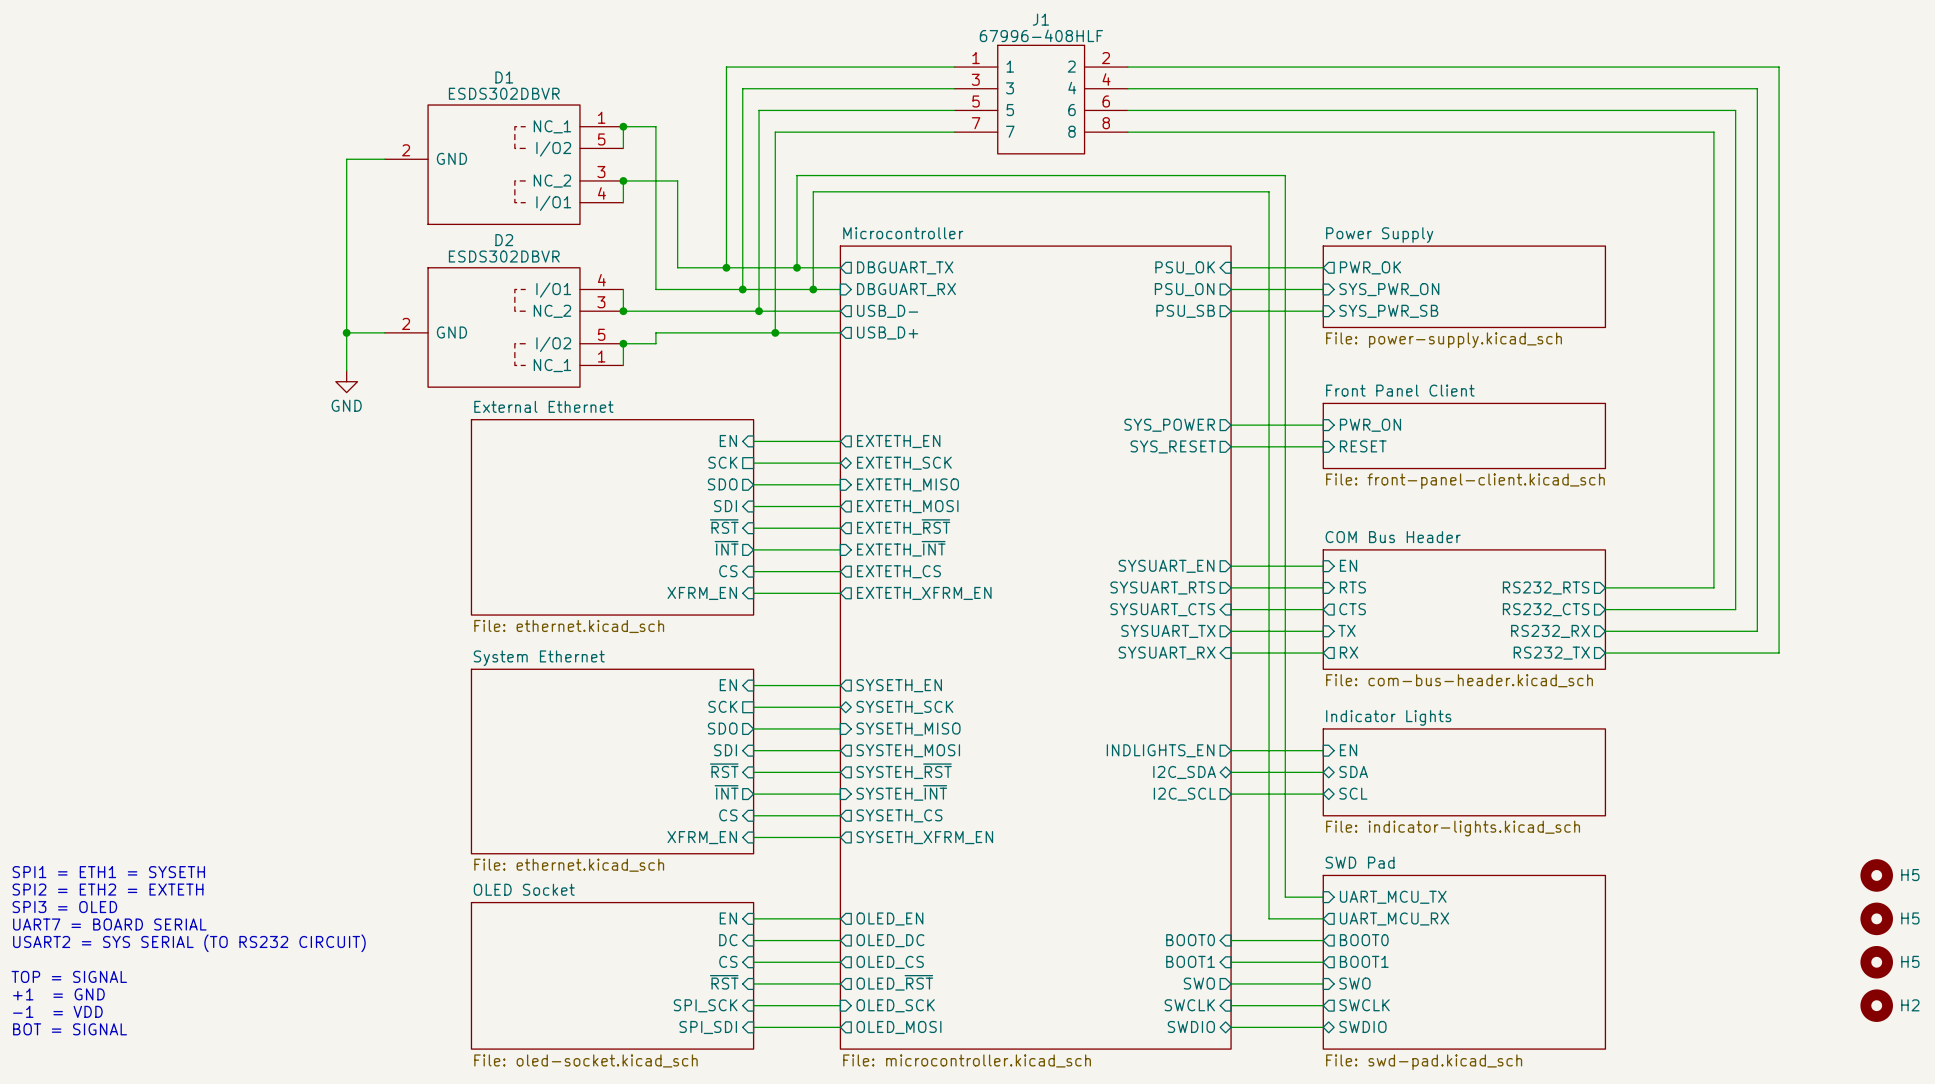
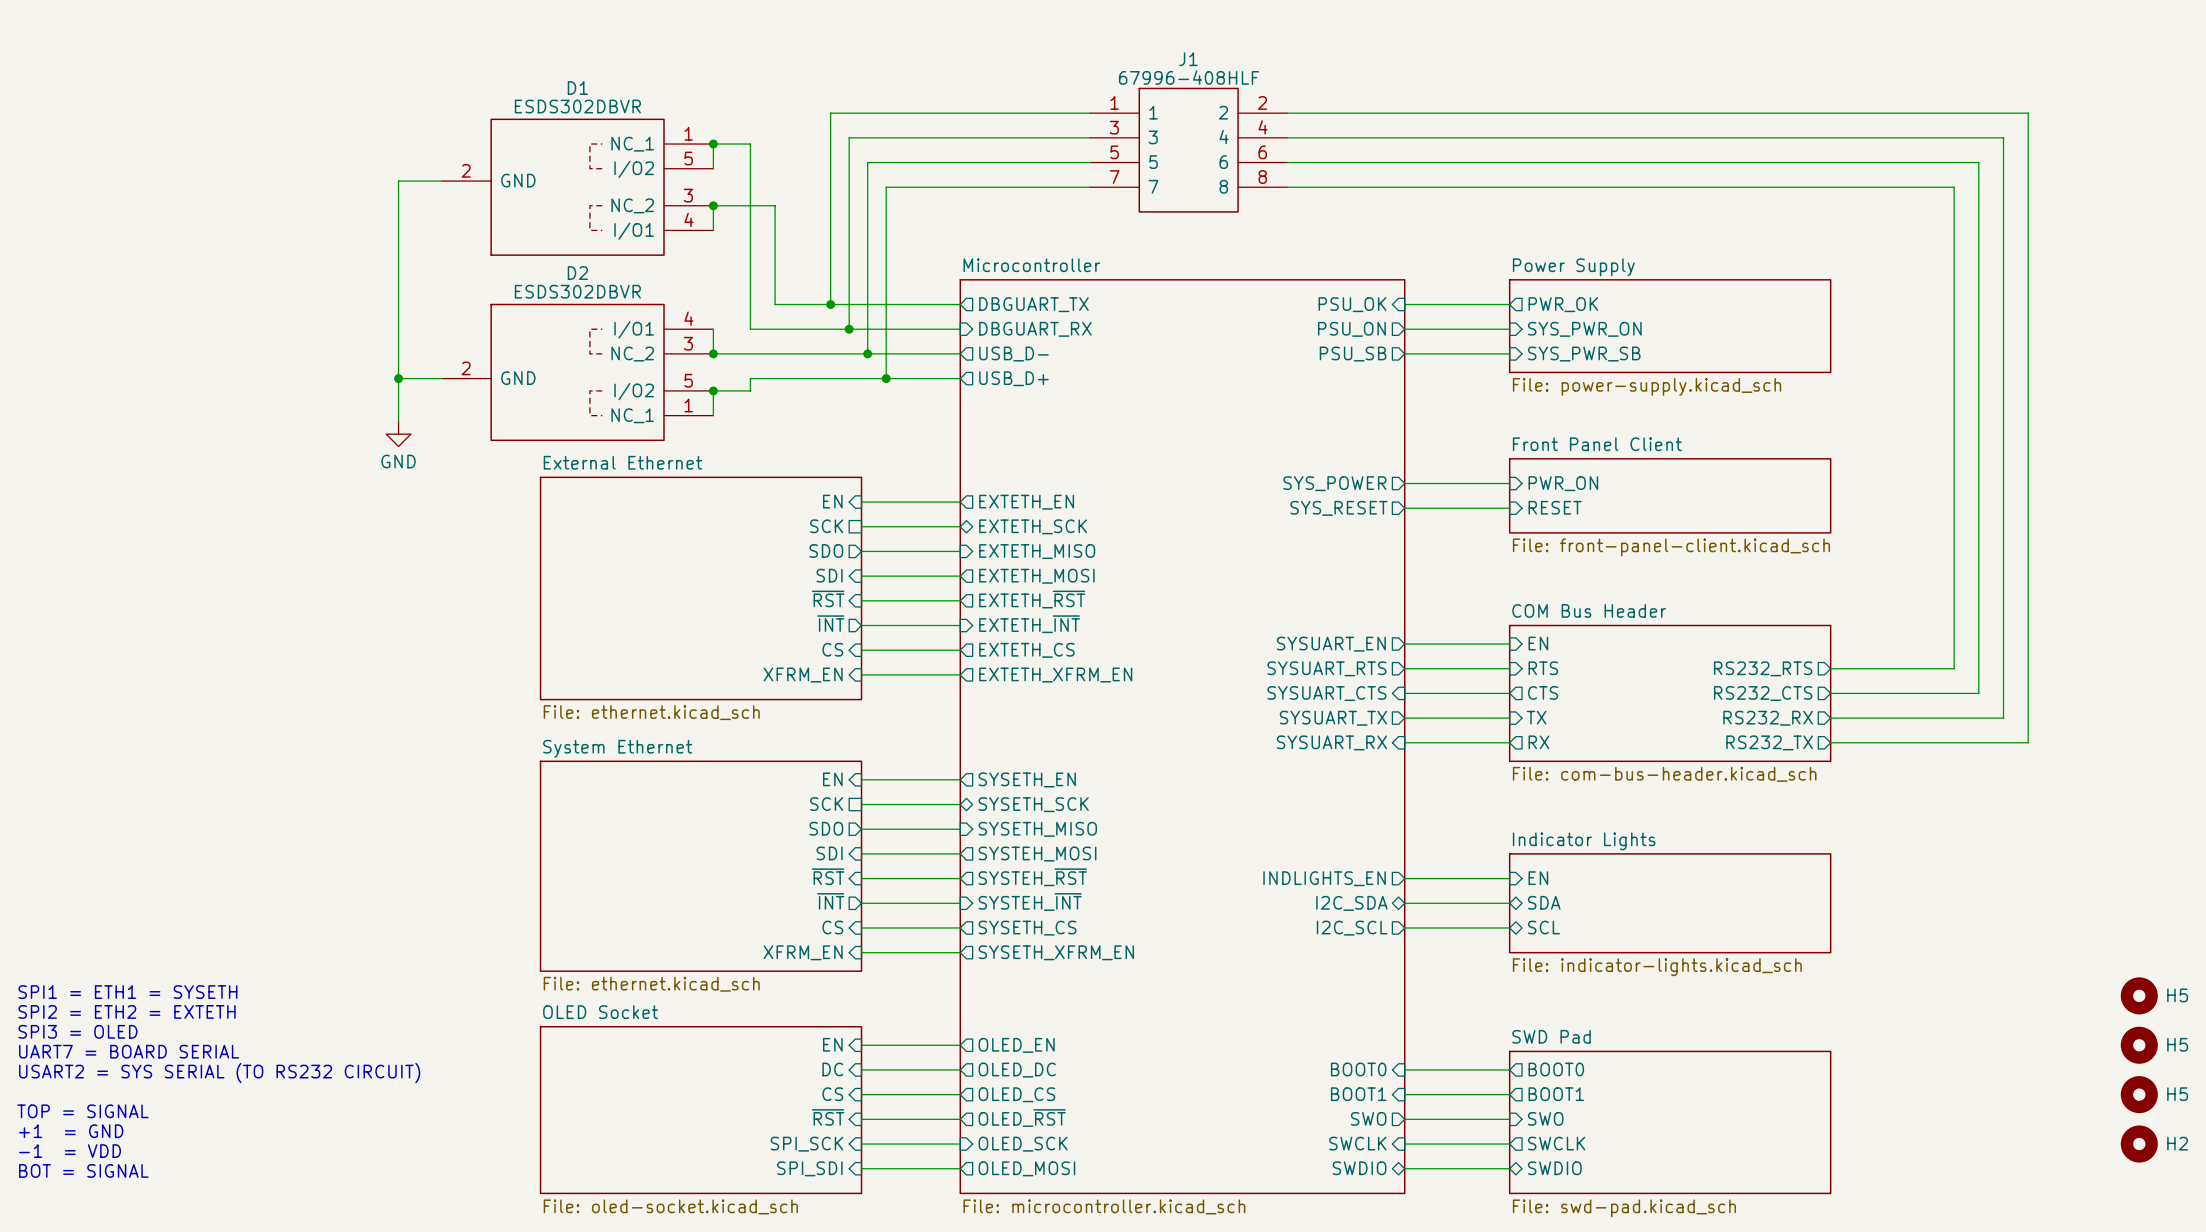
wire: (954, 67) (726, 67) (726, 99) -> (1089, 113) (830, 113)
wire: (1127, 67) (1779, 67) (1779, 99) -> (1287, 113) (2028, 113)
wire: (954, 88) (742, 88) (742, 121) -> (1089, 137) (849, 137)
wire: (1127, 88) (1757, 88) (1757, 121) -> (1287, 137) (2003, 137)
J1 position: (1041, 99) -> (1188, 150)
wire: (954, 110) (759, 110) (759, 142) -> (1089, 162) (867, 162)
wire: (1127, 110) (1735, 110) (1735, 142) -> (1287, 162) (1978, 162)
wire: (954, 132) (775, 132) (775, 164) -> (1089, 187) (886, 187)
wire: (1127, 132) (1713, 132) (1713, 164) -> (1287, 187) (1954, 187)
wire: (797, 267) (797, 175) (1285, 175) (1285, 897) (1323, 897) -> none
junction: (797, 267) -> none
wire: (813, 289) (813, 191) (1269, 191) (1269, 918) (1323, 918) -> none
junction: (813, 289) -> none
sheet pin: INDLIGHTS_EN (1160, 750) -> none
wire: (1231, 750) (1323, 750) -> (1404, 927) (1509, 927)
sheet pin: EN (1348, 750) -> none
sheet pin shape: bidirectional (1353, 771) -> input (1538, 878)
sheet pin: SDA (1353, 771) -> EN (1538, 878)
sheet pin shape: bidirectional (1184, 772) -> output (1324, 878)
sheet pin: I2C_SDA (1184, 772) -> INDLIGHTS_EN (1324, 878)
sheet Indicator Lights position: (1464, 772) -> (1670, 903)
sheet pin: SCL (1353, 793) -> SDA (1544, 902)
sheet pin shape: output (1184, 794) -> bidirectional (1351, 903)
sheet pin: I2C_SCL (1184, 794) -> I2C_SDA (1351, 903)
sheet pin: none -> I2C_SCL (1352, 928)
sheet pin: none -> SCL (1543, 927)
sheet pin: UART_MCU_TX (1393, 897) -> none
sheet pin: UART_MCU_RX (1394, 918) -> none
sheet SWD Pad: File: swd-pad.kicad_sch (1464, 962) -> none
sheet SWD Pad: none -> File: swd-pad.kicad_sch (1670, 1122)

